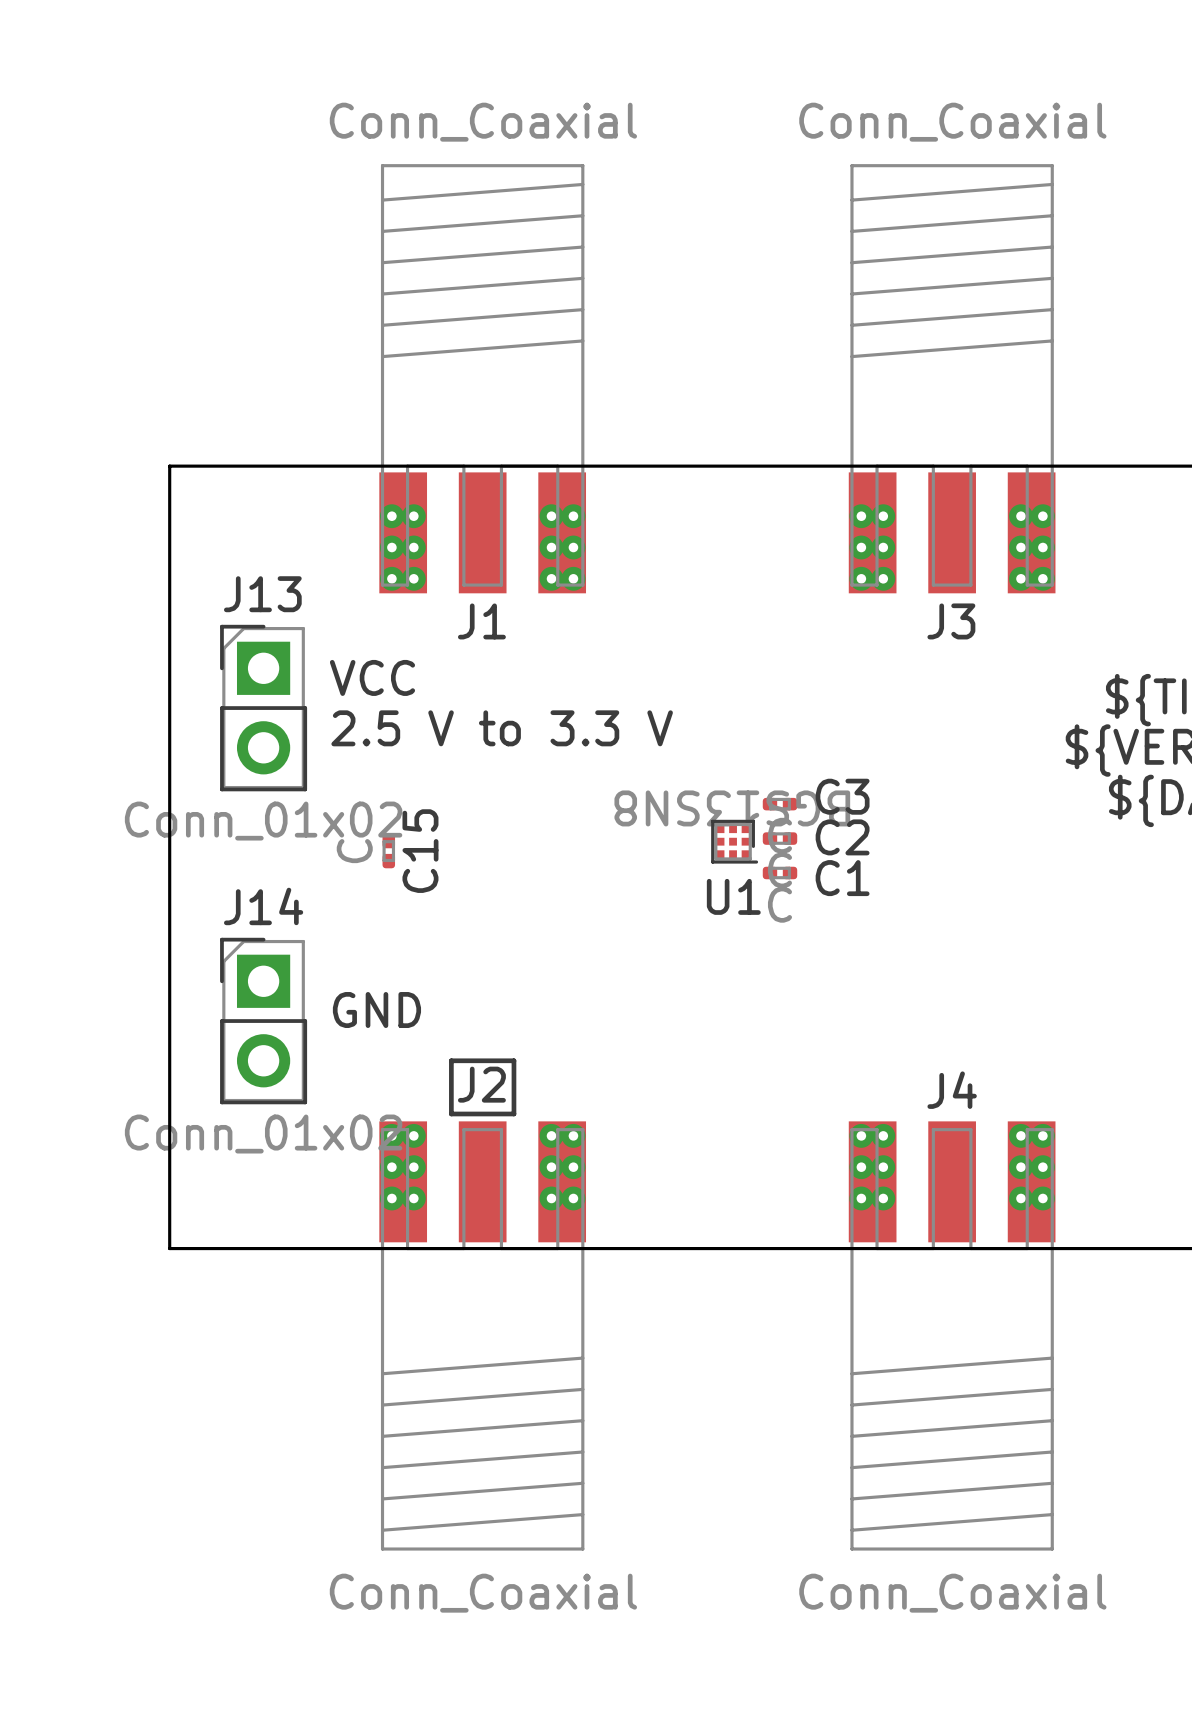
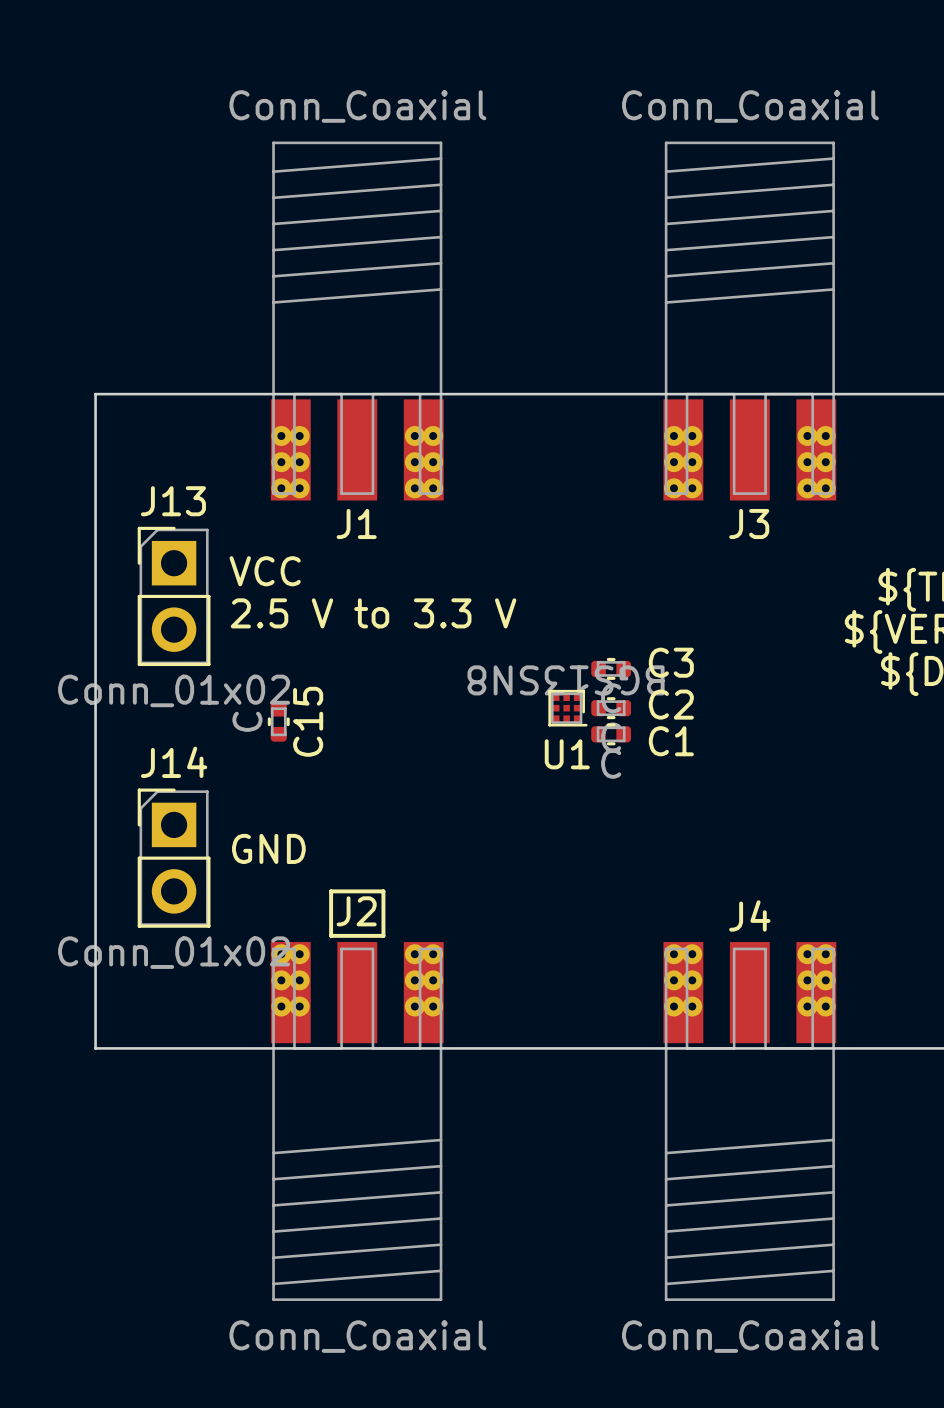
C3 footprint: [762, 797, 798, 811] -> [591, 657, 632, 680]
C2 footprint: [762, 832, 798, 845] -> [591, 697, 632, 720]
C15 footprint: [382, 833, 396, 869] -> [267, 701, 290, 742]
C1 footprint: [762, 866, 798, 880] -> [591, 723, 632, 746]

